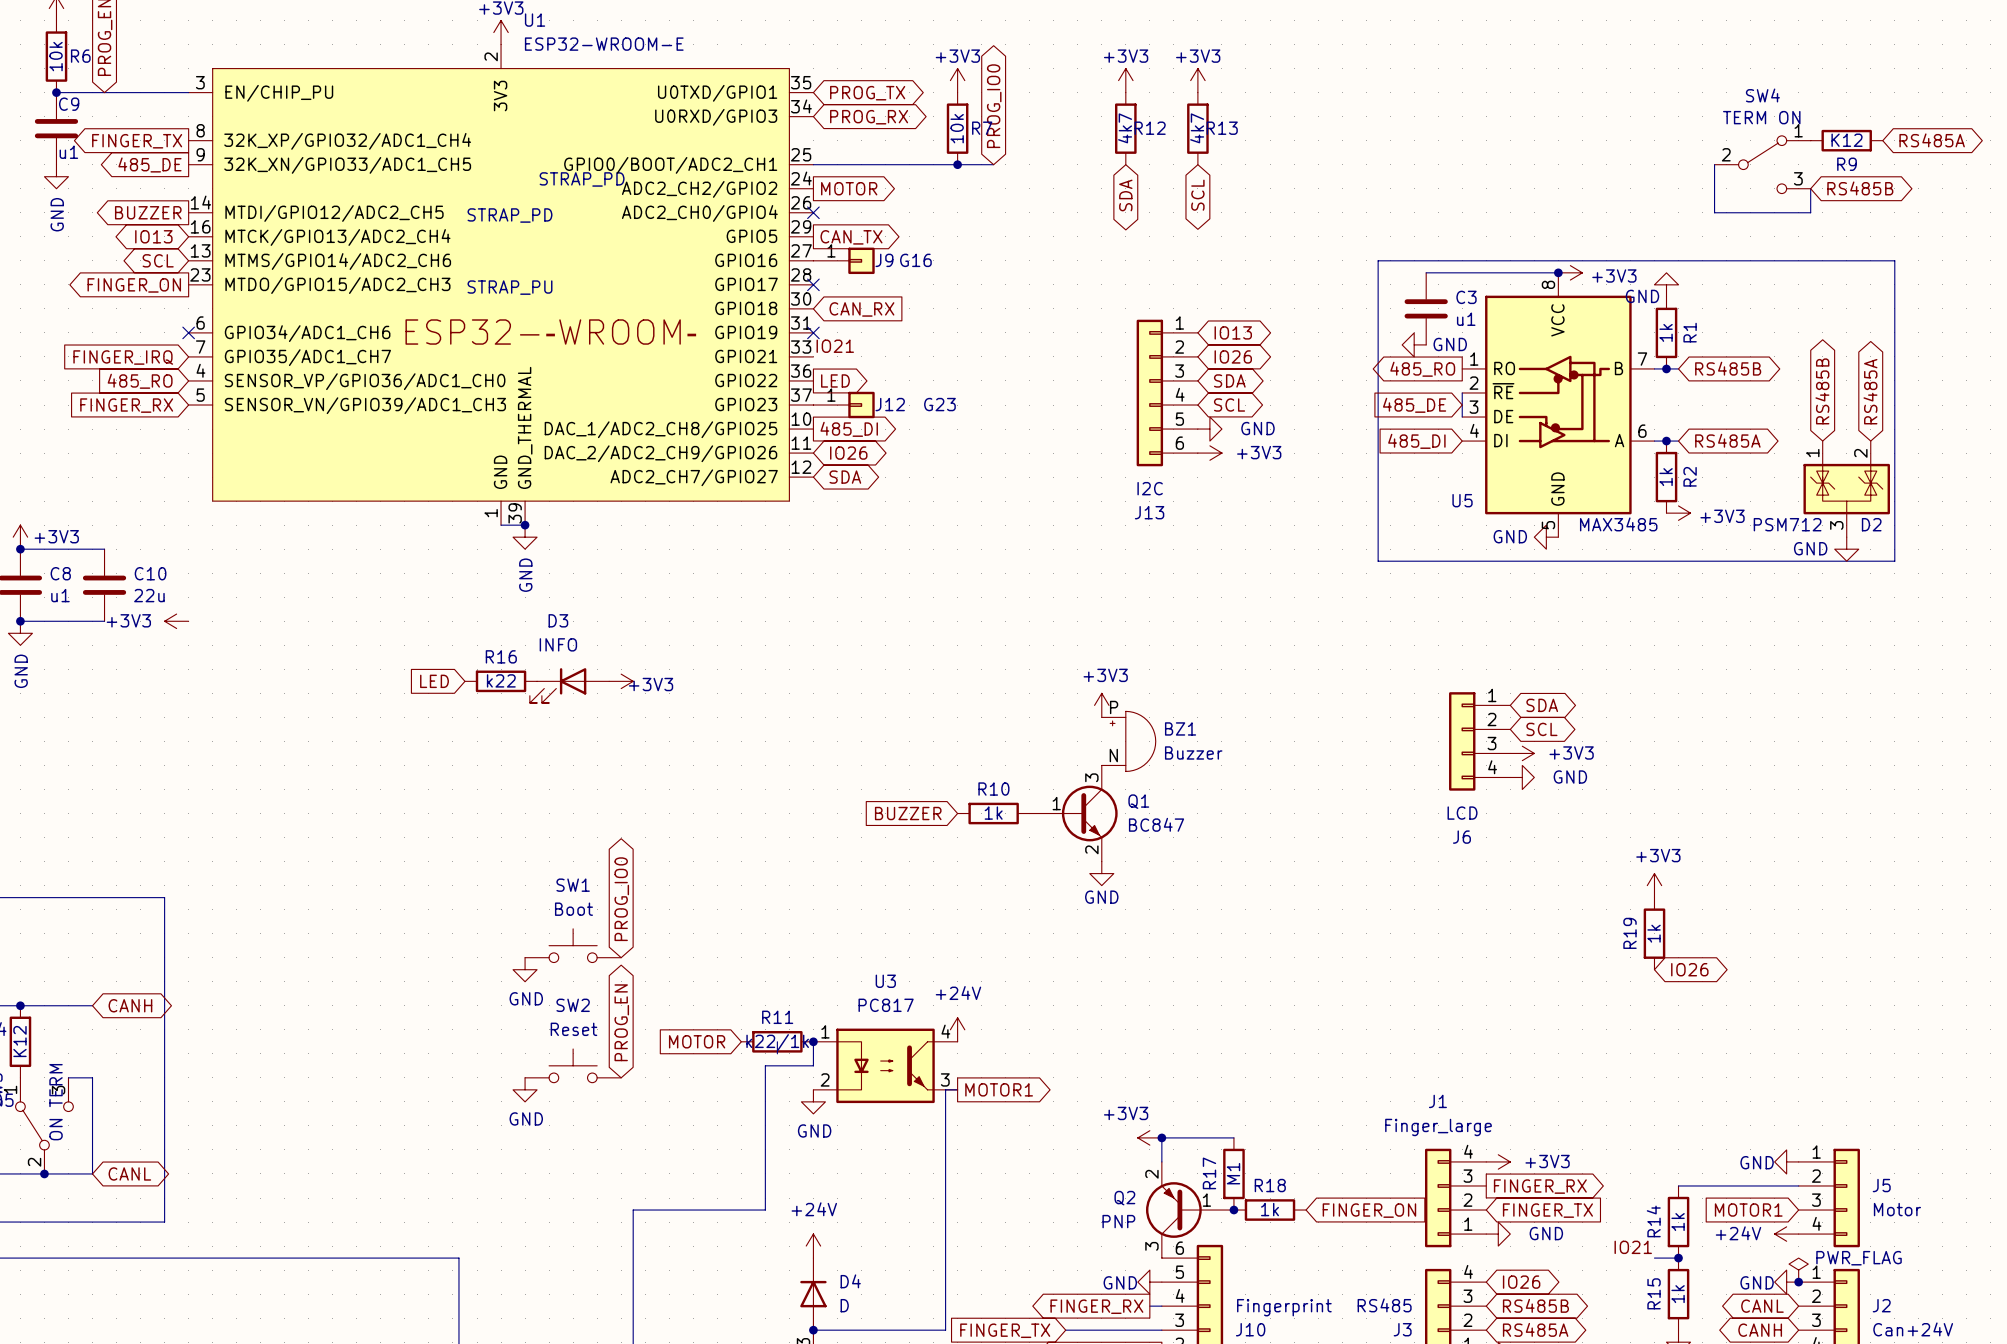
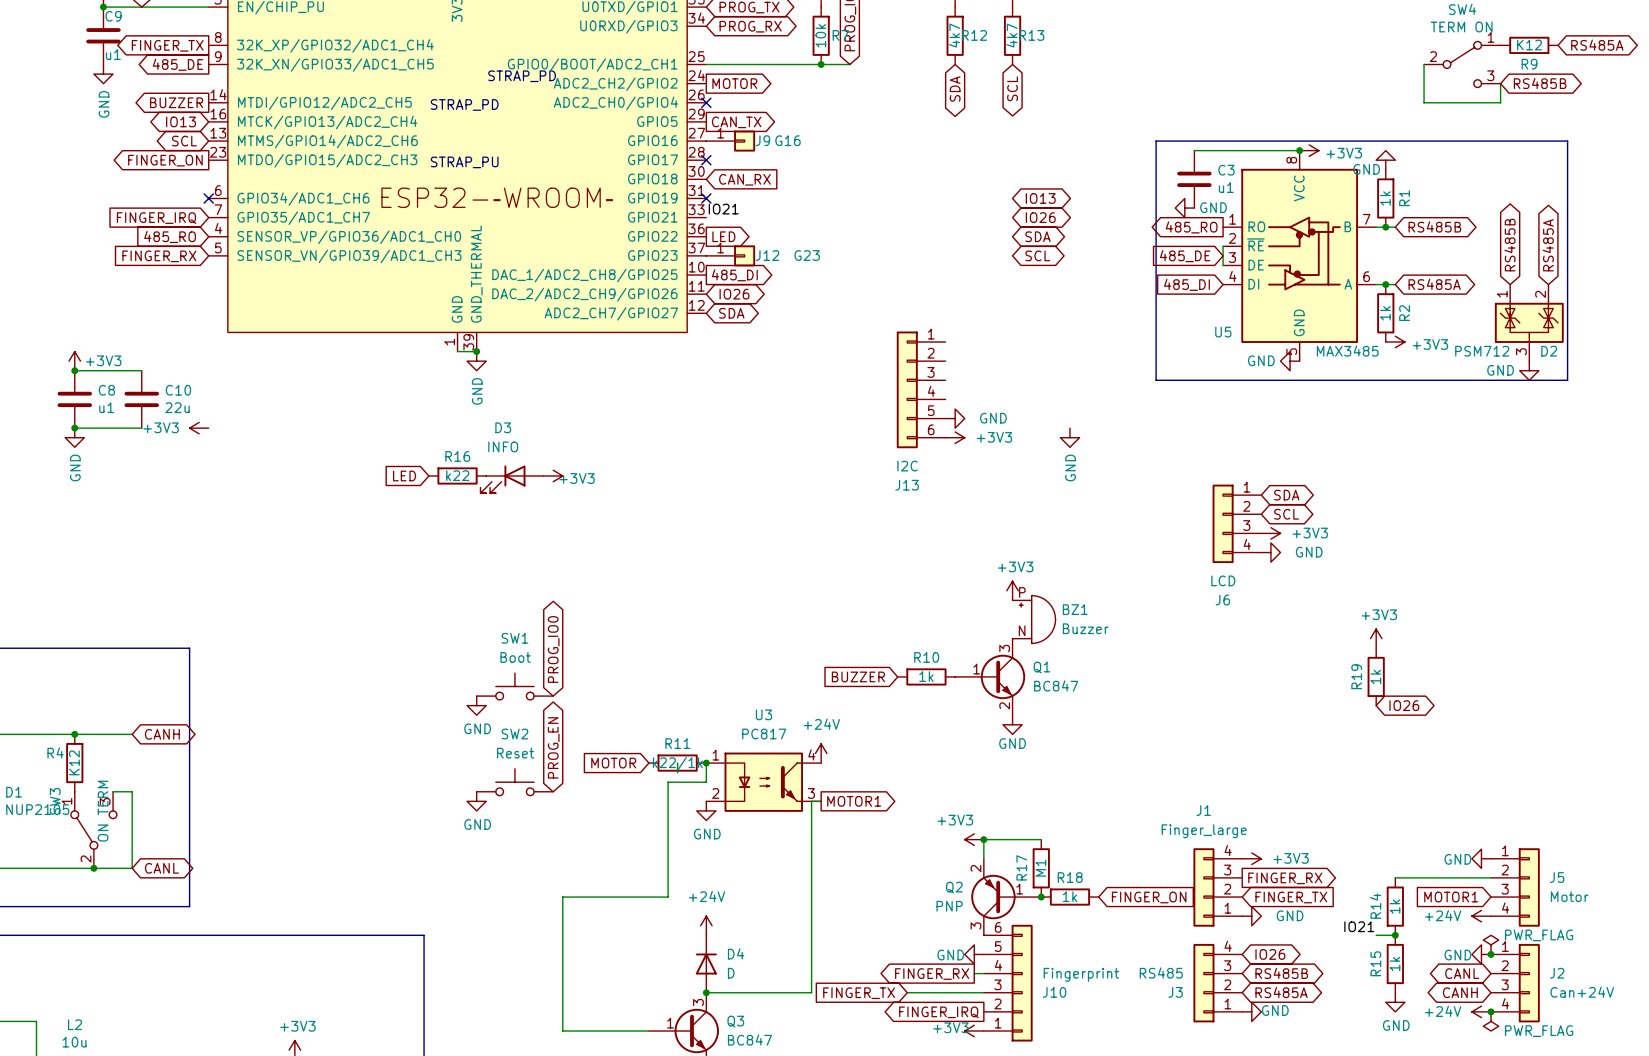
J13 position: (1167, 392) -> (921, 389)
power symbol: GND (1209, 429) -> none
power symbol: +3V3 (1209, 453) -> none
power symbol: none -> GND (955, 418)
power symbol: none -> GND (1069, 437)
power symbol text position: +3V3 (1105, 675) -> +3V3 (994, 437)
power symbol rotation: 0° (1101, 705) -> 90° clockwise (955, 437)
power symbol position: +3V3 (1101, 705) -> +3V3 (955, 437)
BZ1 position: (1128, 741) -> (1034, 619)
global label position: BUZZER (908, 813) -> BUZZER (858, 676)
R10 position: (993, 813) -> (926, 676)
Q1 position: (1073, 813) -> (990, 676)
power symbol: none -> +3V3 (1012, 590)
power symbol: GND (1101, 873) -> none
power symbol: none -> GND (1012, 724)

